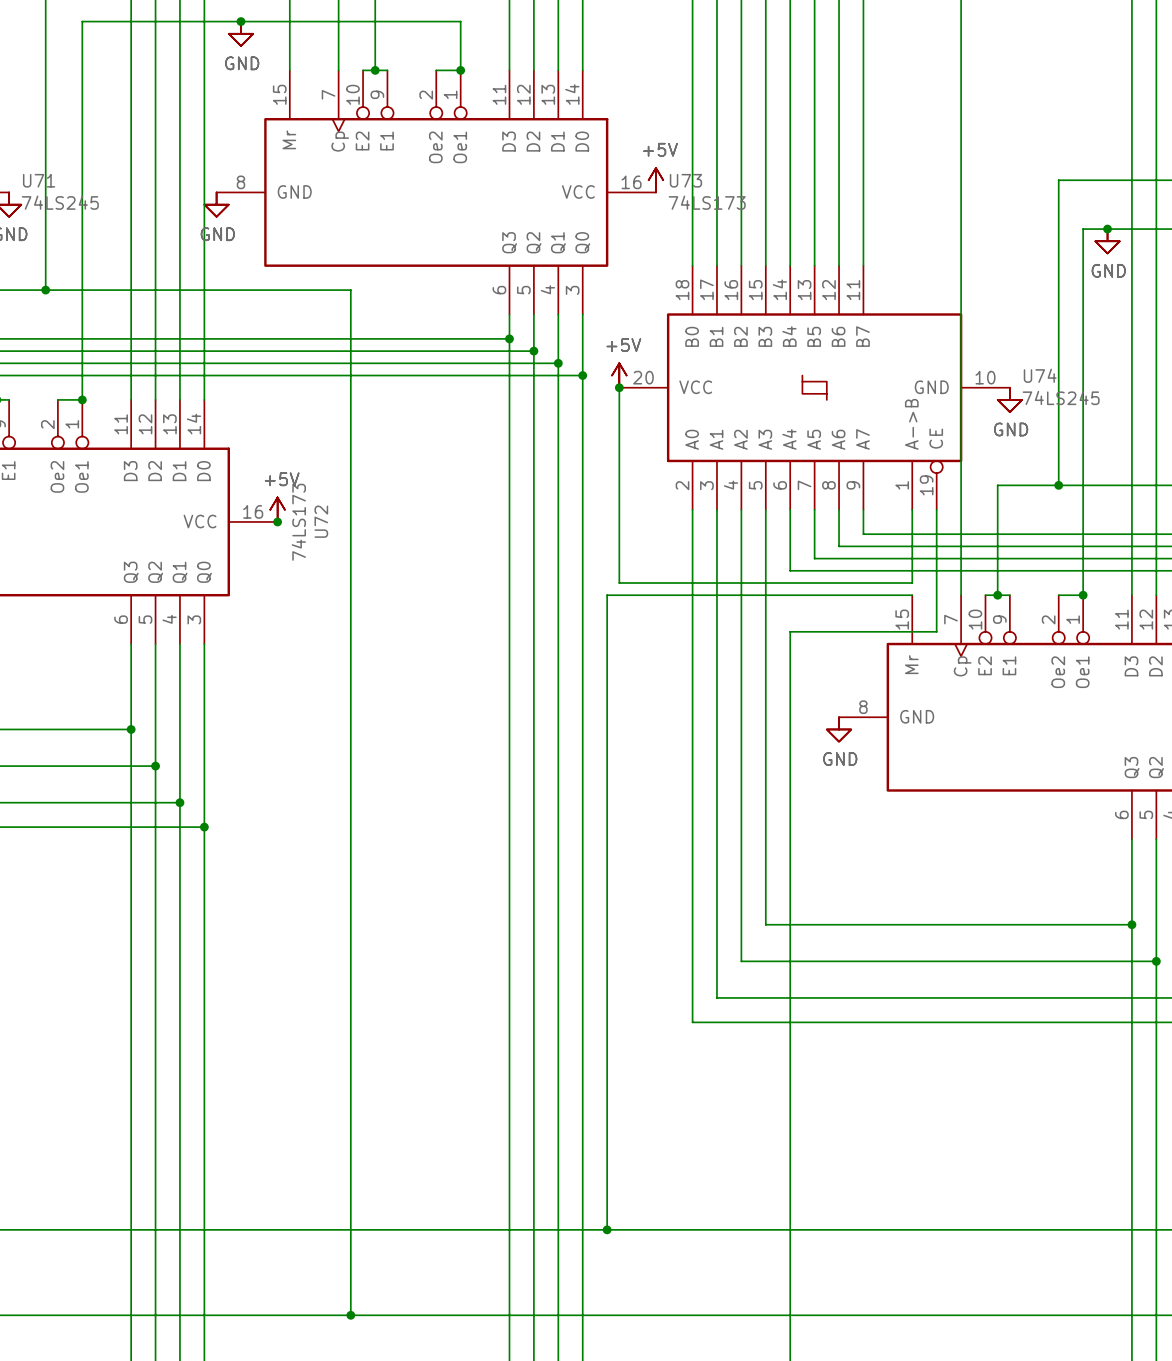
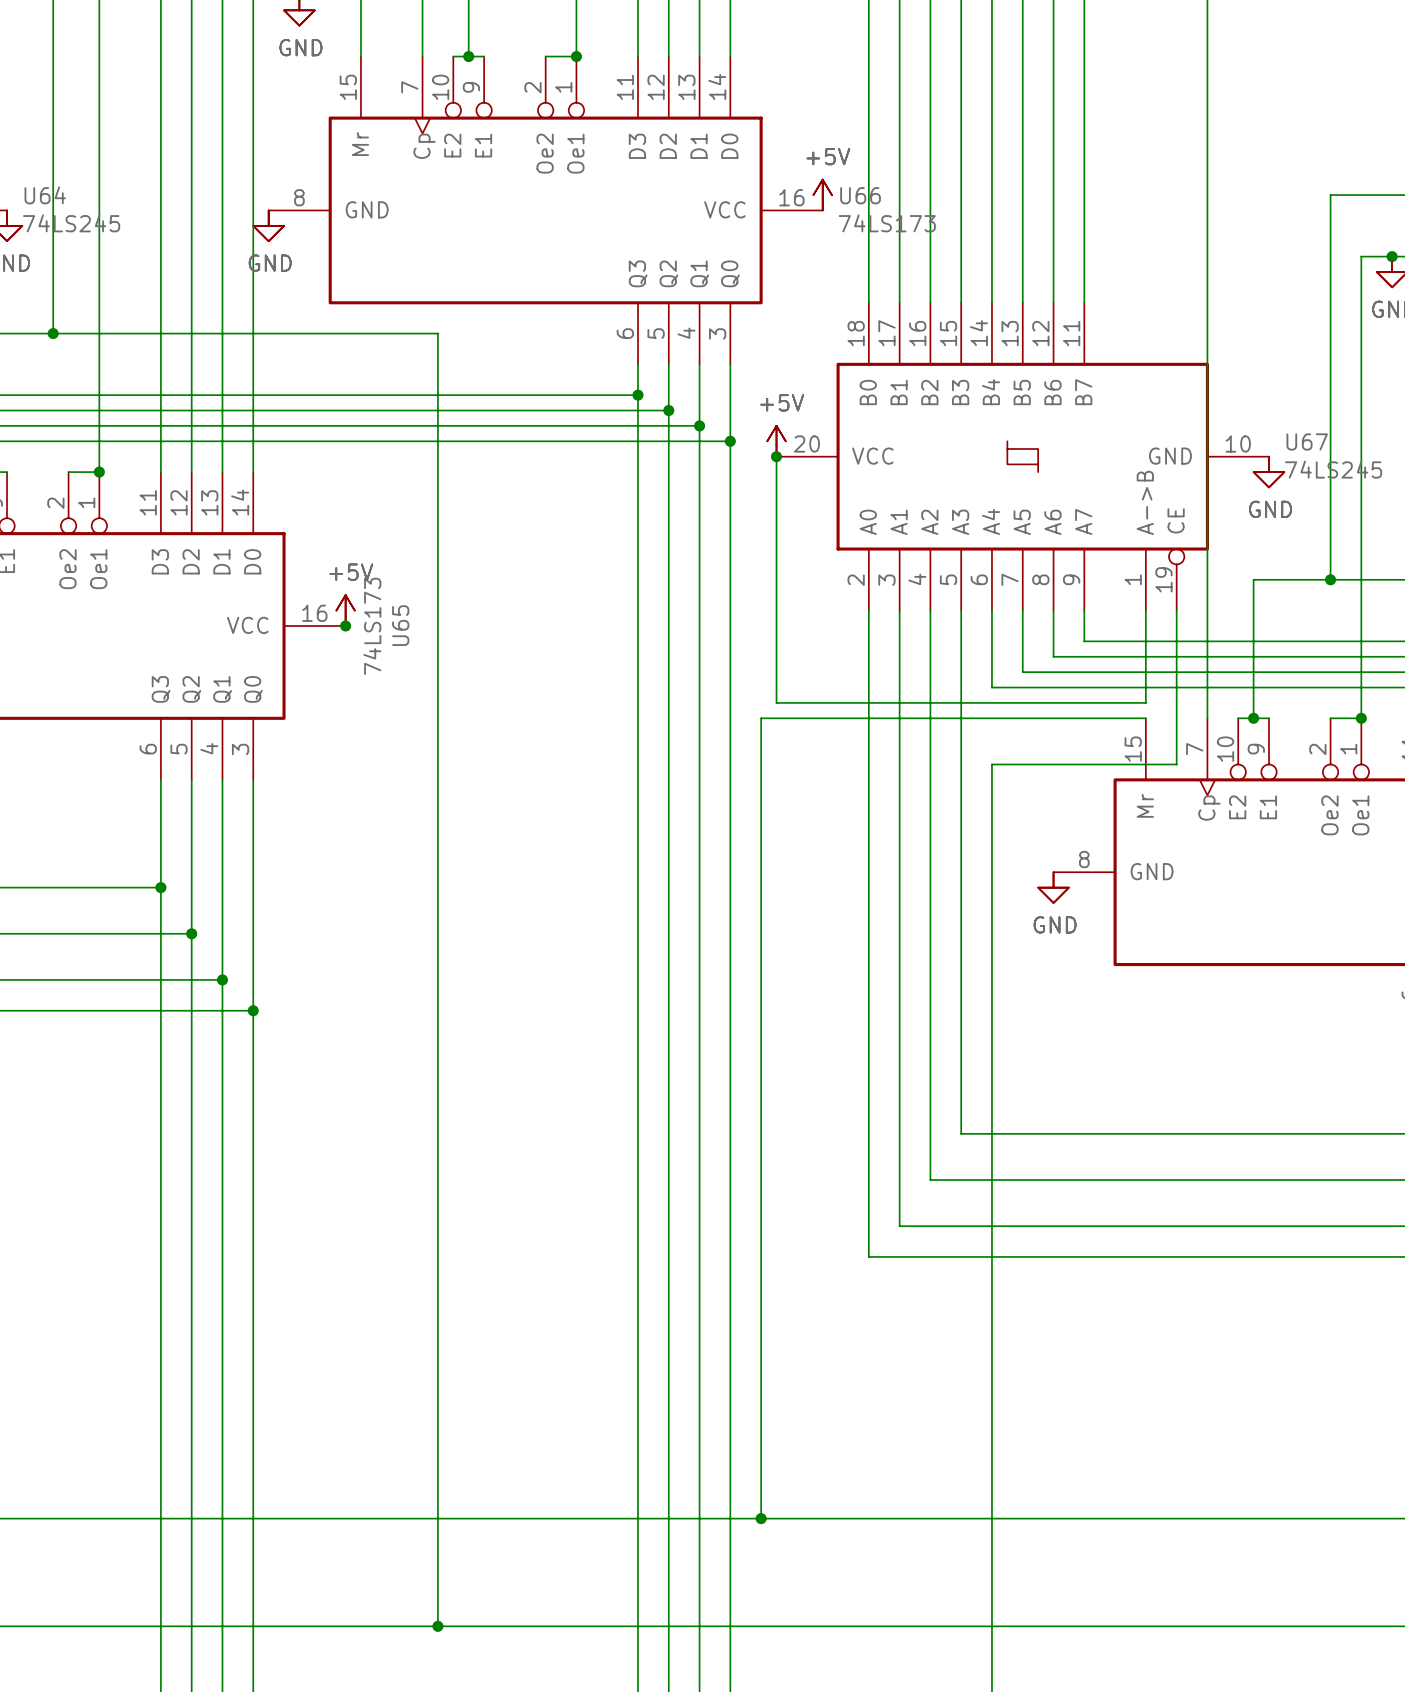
U71 name: U71 (39, 180) -> U64 (45, 195)
U73 name: U73 (685, 180) -> U66 (860, 195)
U74 name: U74 (1040, 375) -> U67 (1307, 441)
U72 name: U72 (321, 521) -> U65 (400, 625)

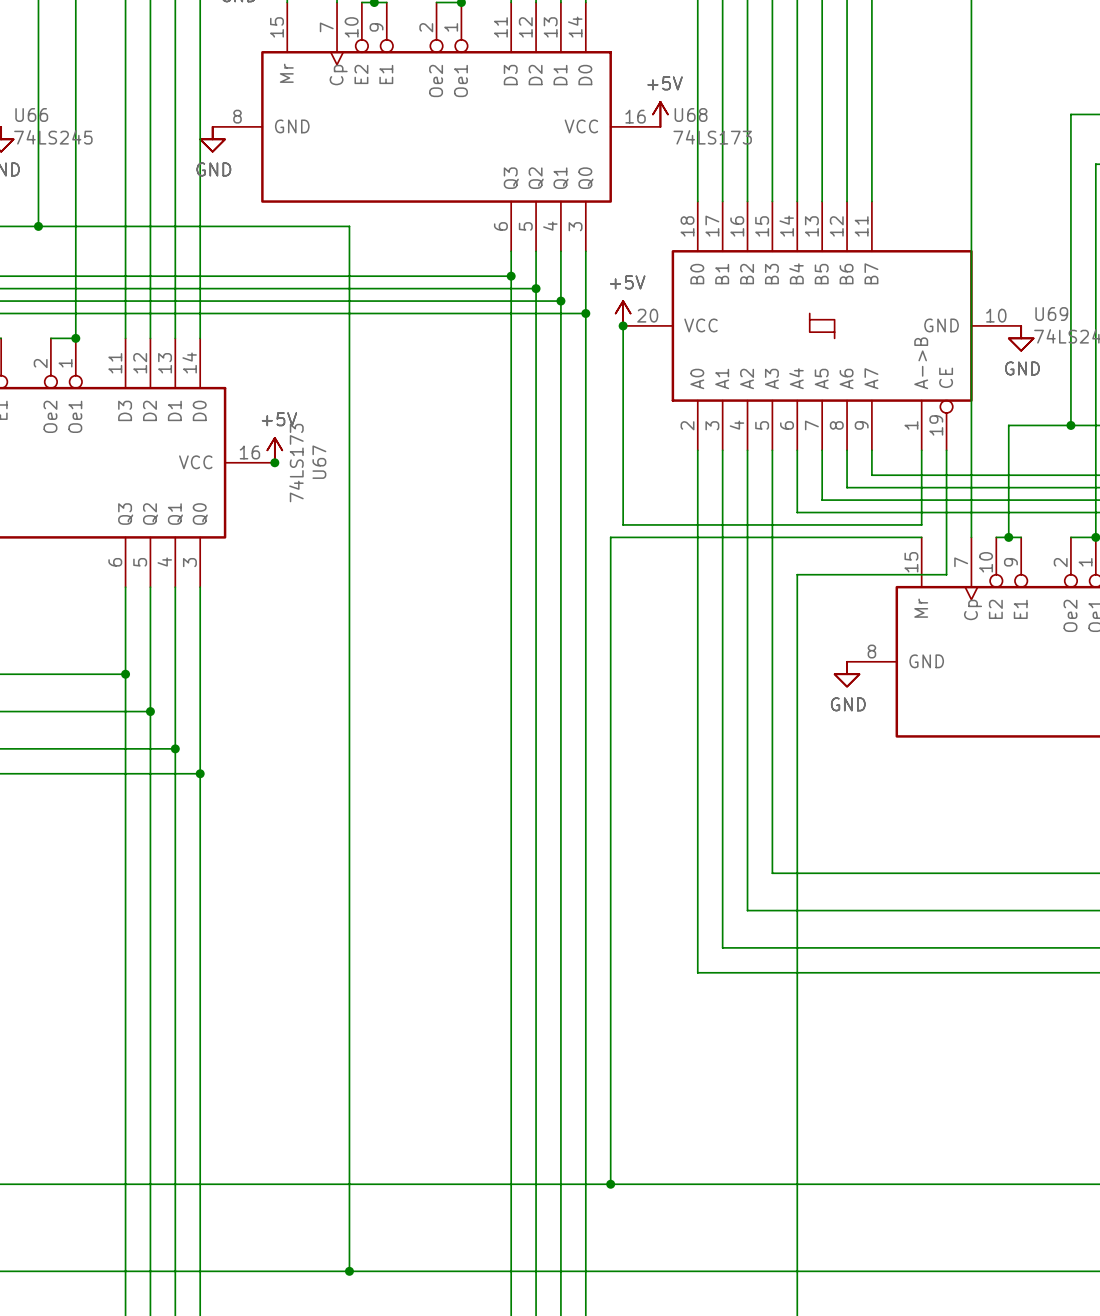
U64 name: U64 (45, 195) -> U66 (31, 114)
U66 name: U66 (860, 195) -> U68 (691, 114)
U67 name: U67 (1307, 441) -> U69 (1051, 314)
U65 name: U65 (400, 625) -> U67 (319, 462)

